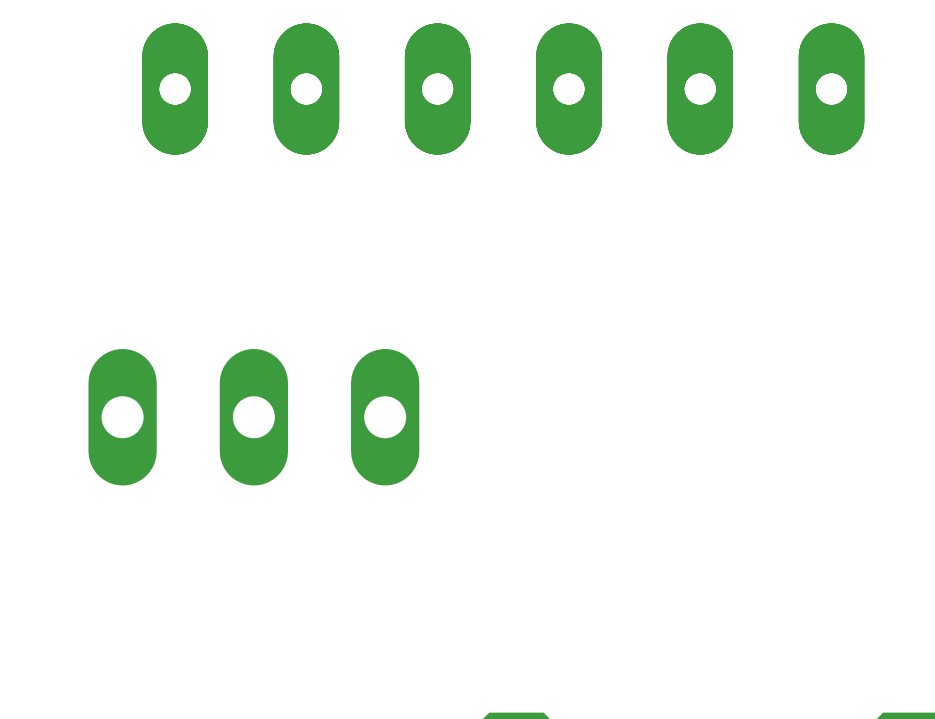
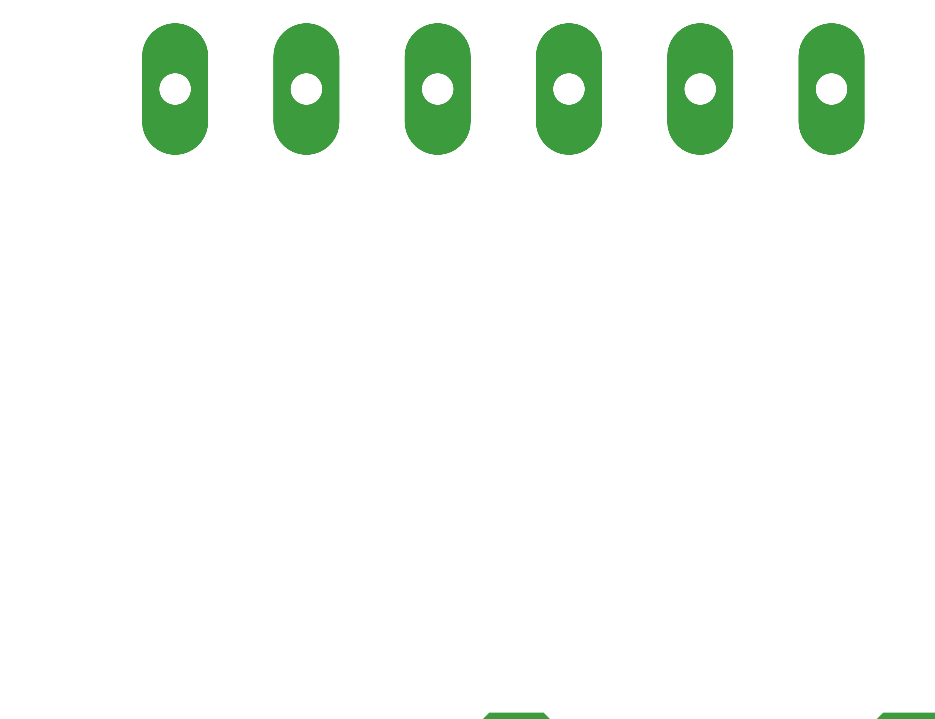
part: (253, 417) -> none

